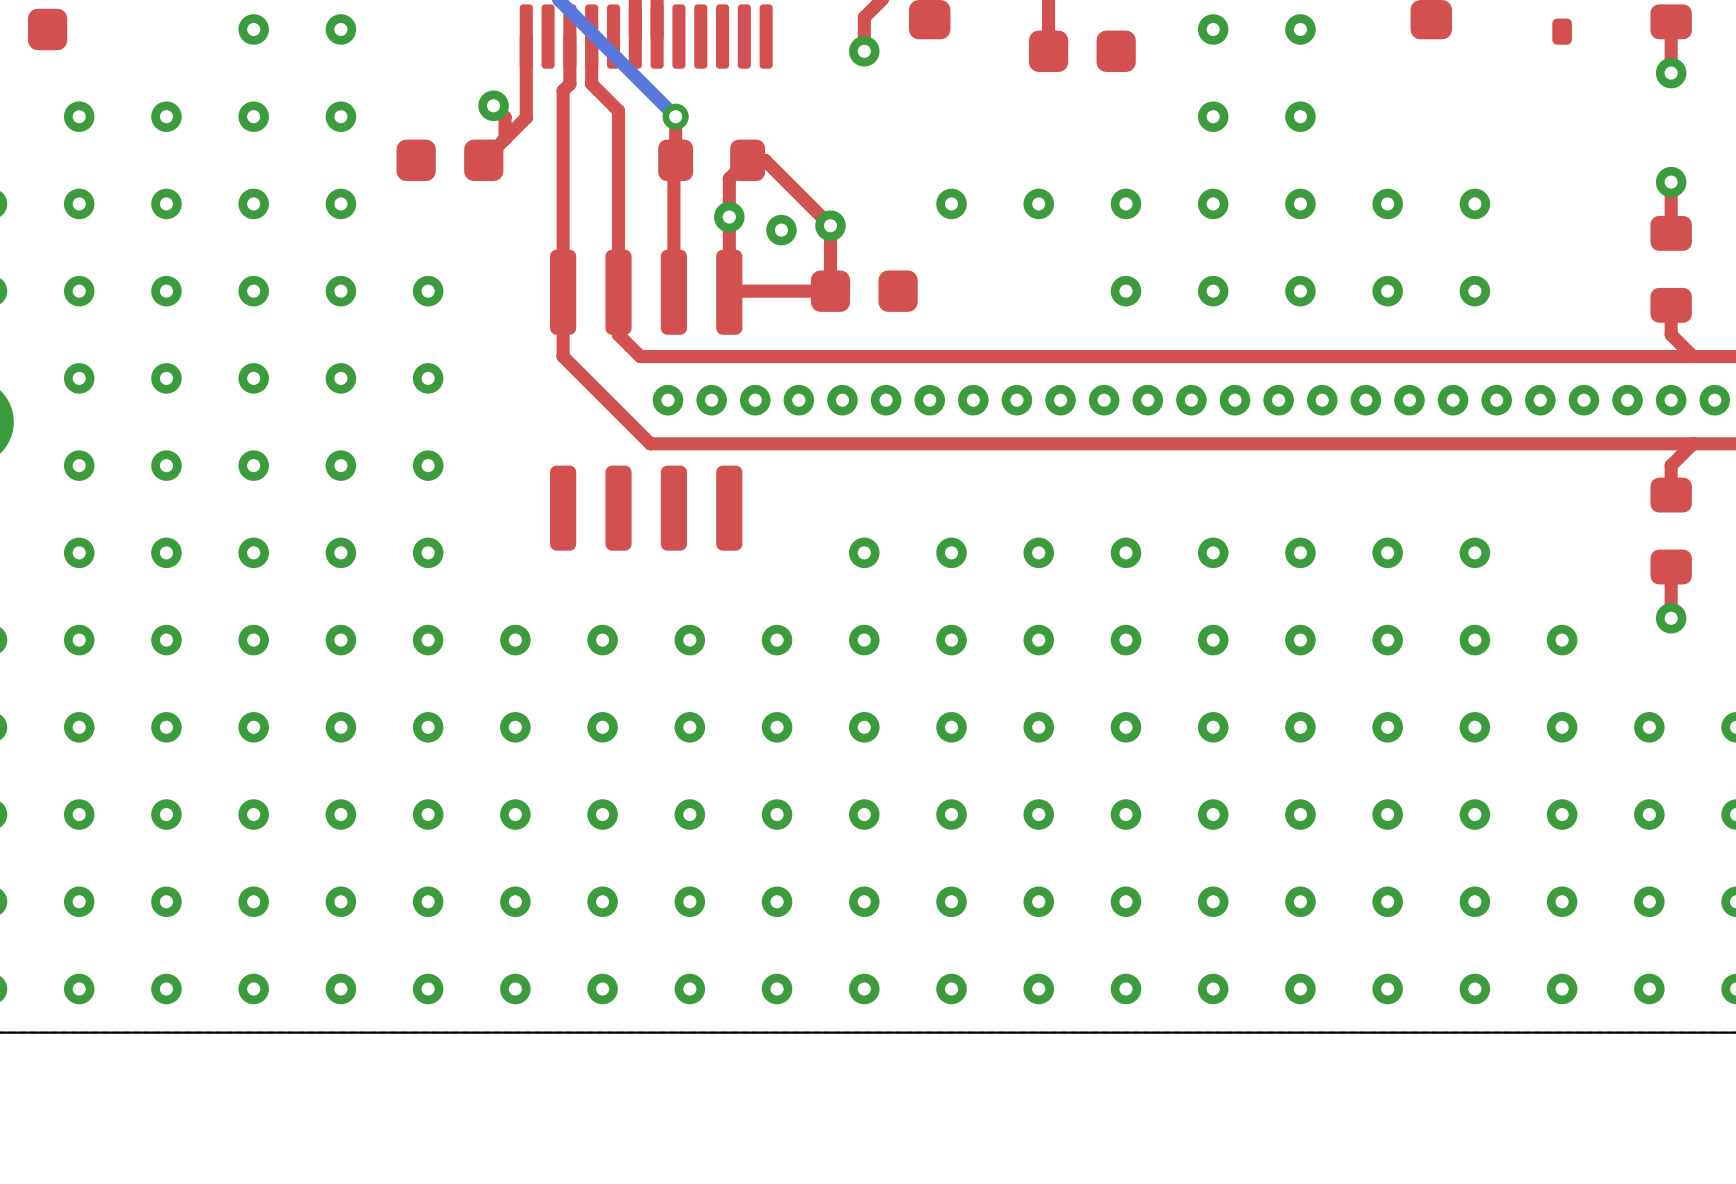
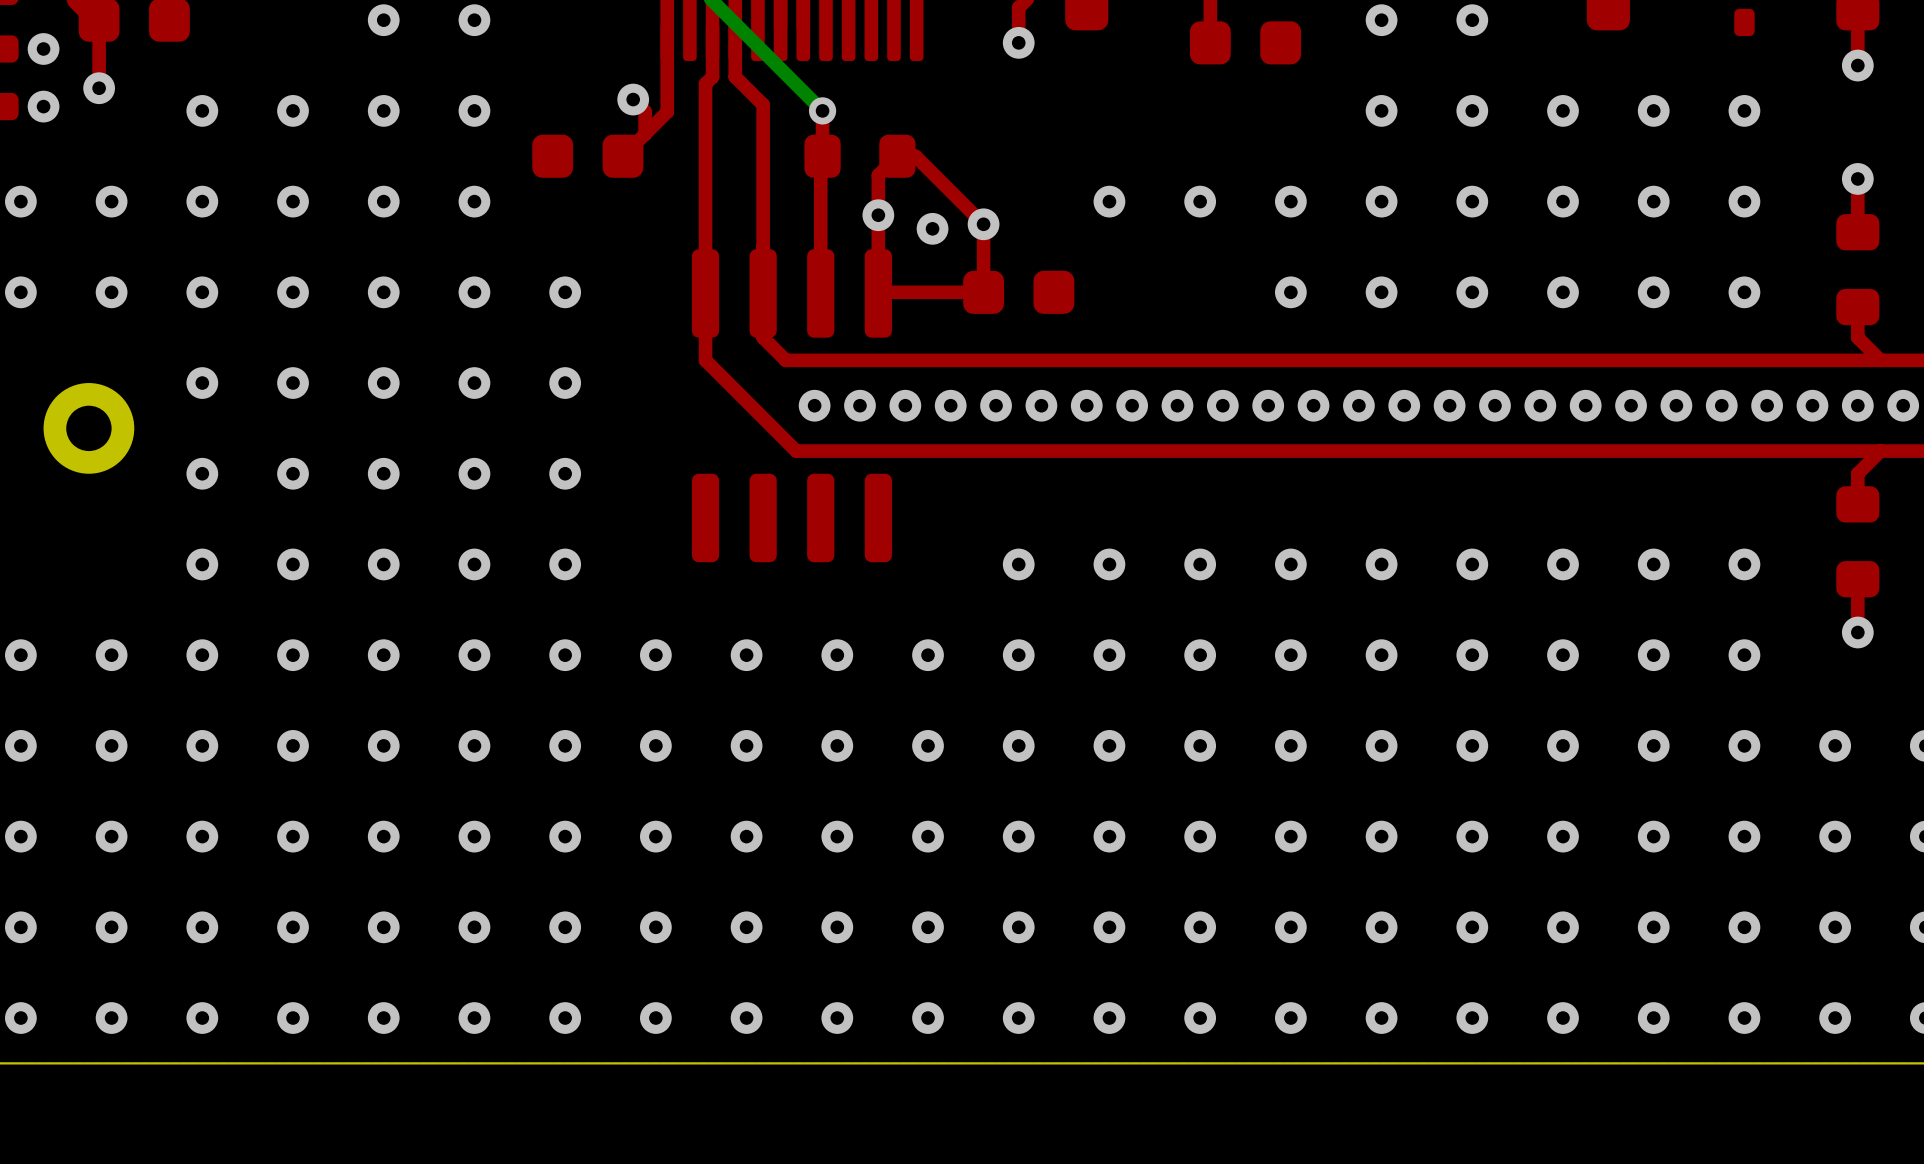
via: none -> (1563, 110)
via: none -> (1653, 110)
via: none -> (1744, 110)
via: none -> (1744, 201)
via: none -> (1744, 292)
via: none -> (1744, 564)

